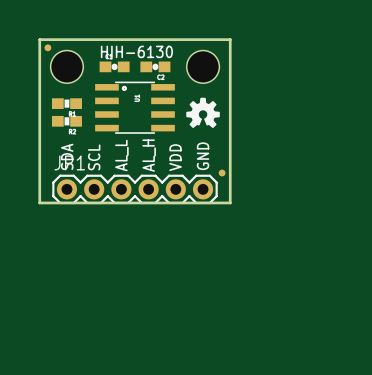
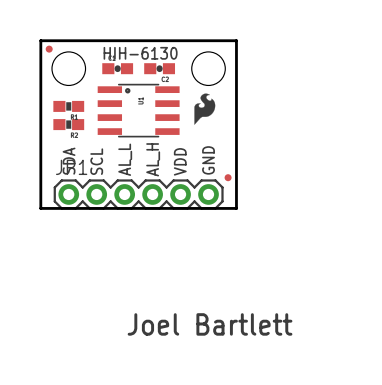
drawing shape: [186, 97, 220, 128] -> [194, 93, 216, 125]
text: none -> Joel Bartlett (210, 324)

